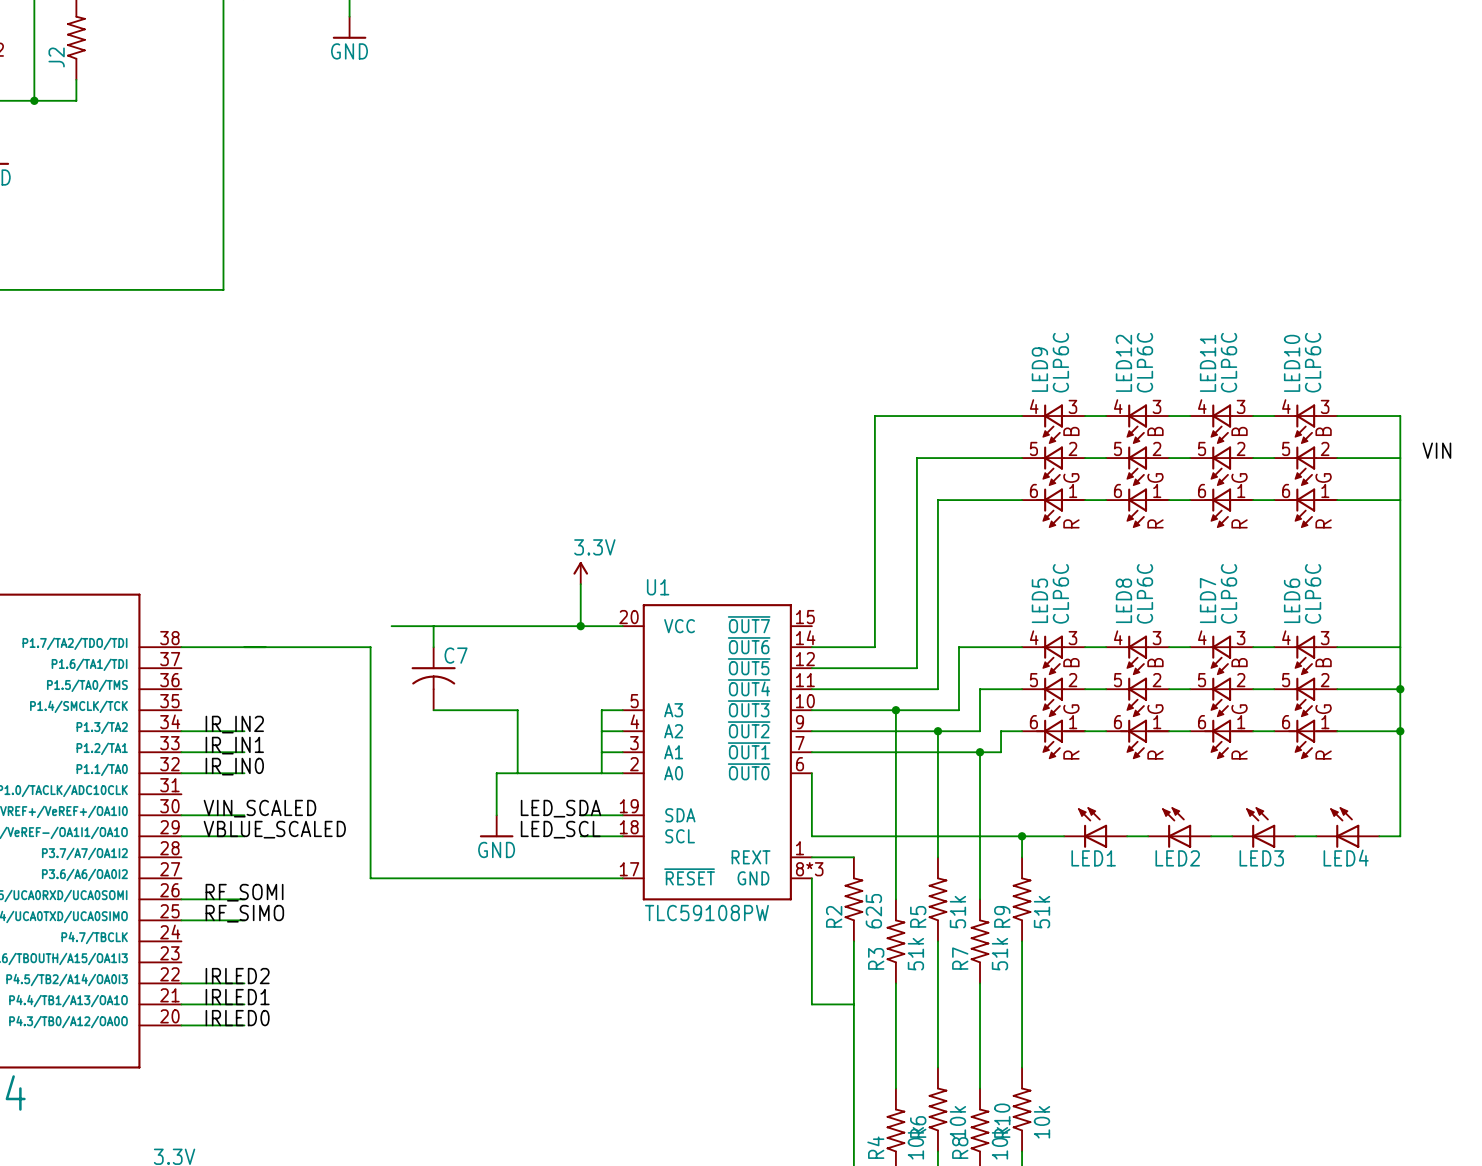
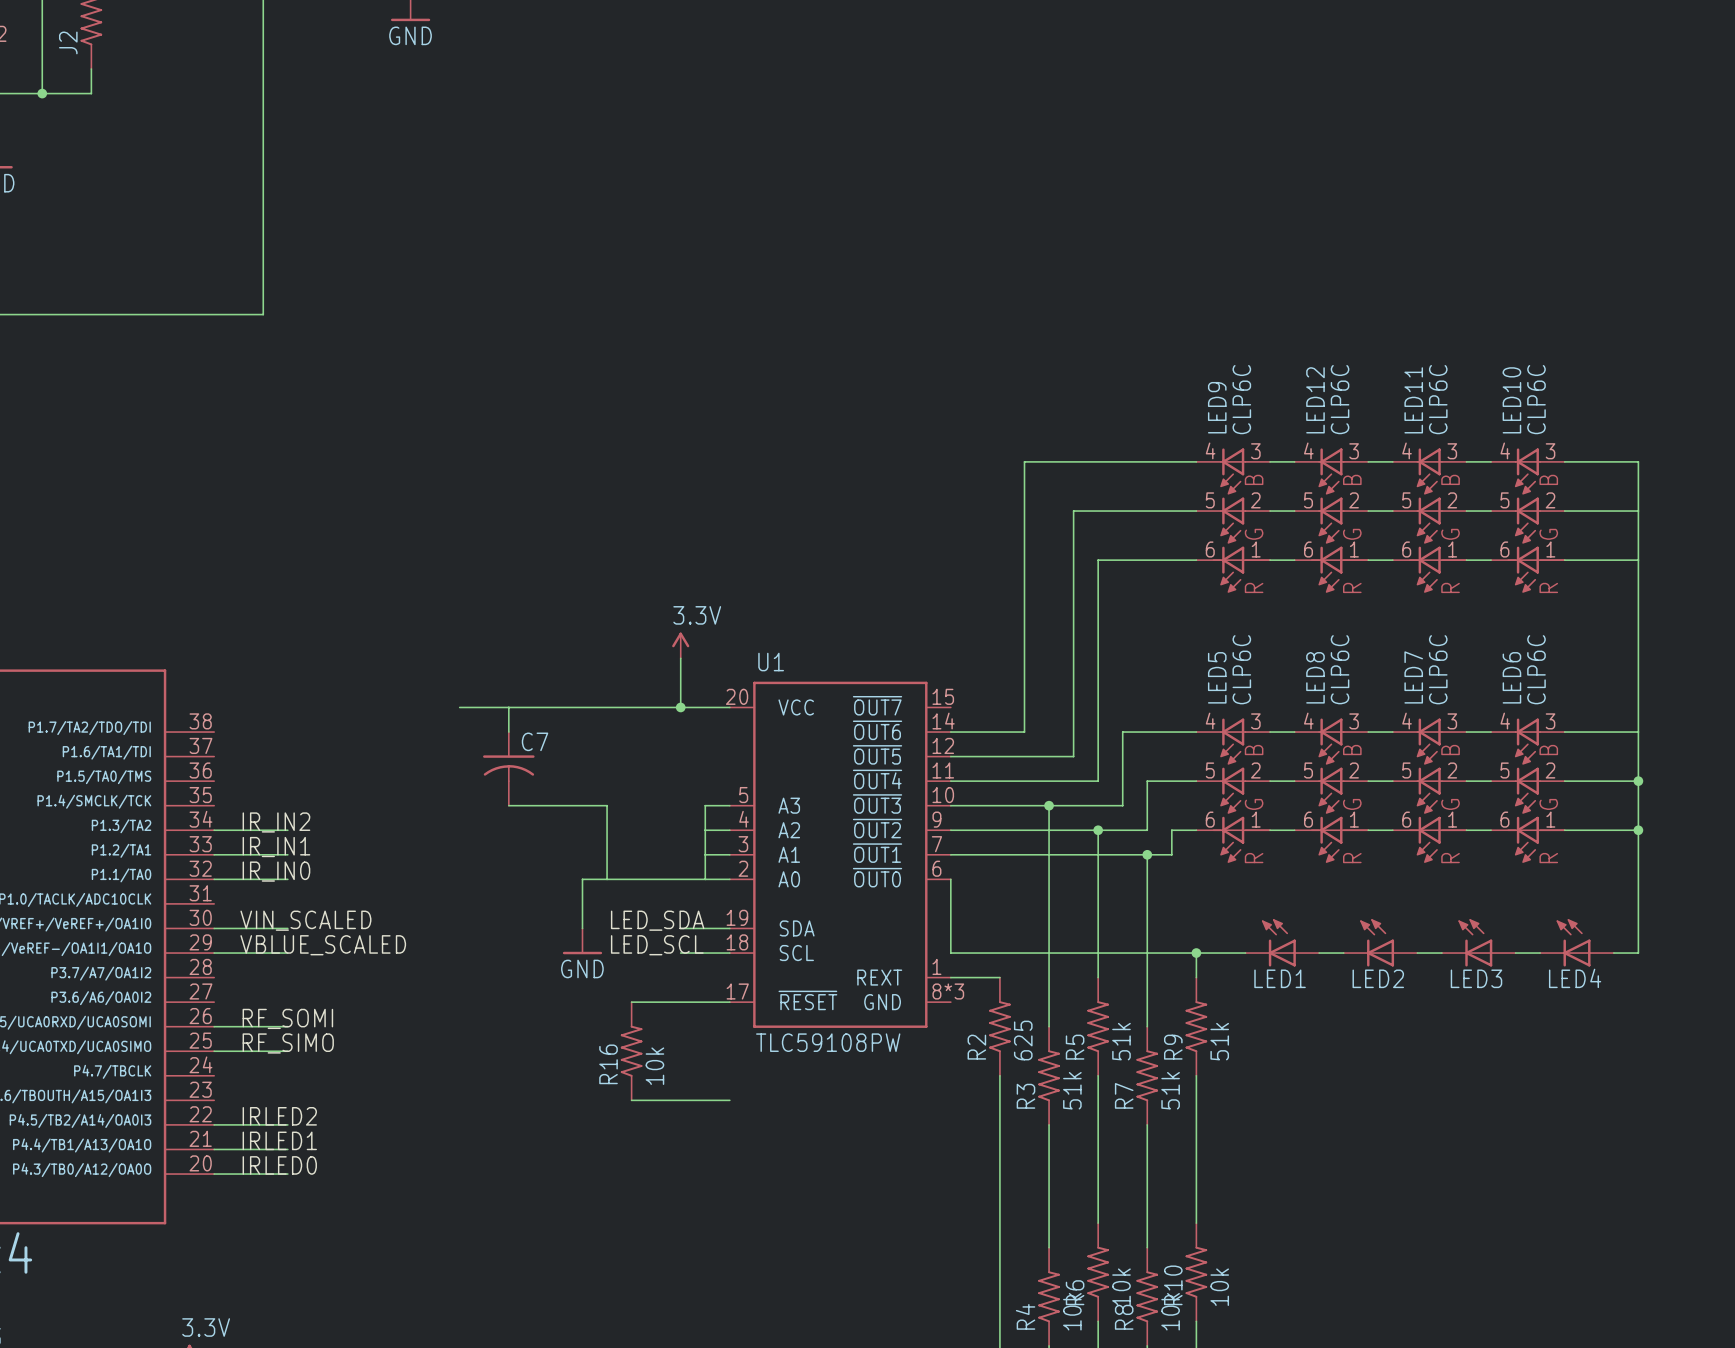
label: VIN (1436, 450) -> none
wire: (181, 647) (370, 647) (370, 878) (538, 878) -> none
wire: (811, 878) (811, 1004) (853, 1004) -> none
R16: none -> 10k (631, 1051)
wire: none -> (631, 1100) (729, 1100)

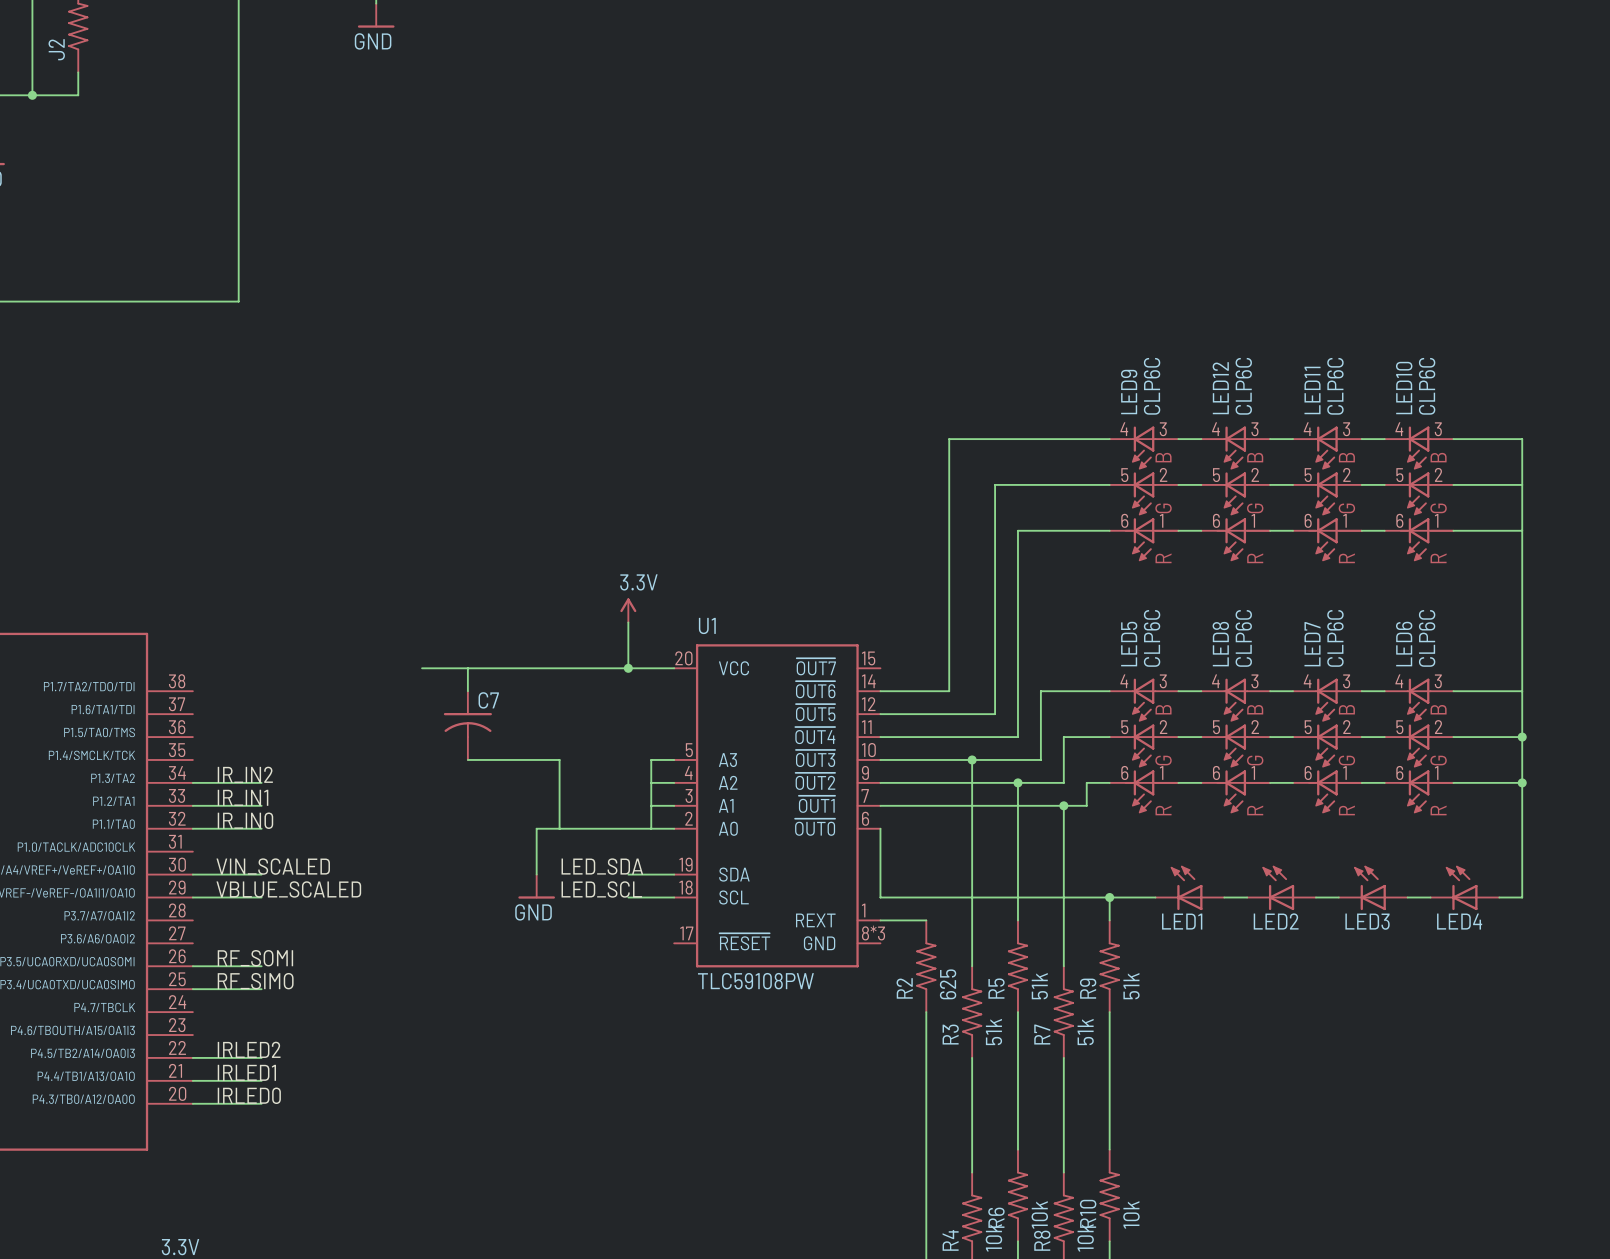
wire: (631, 1002) (729, 1002) -> none
R16: 10k (631, 1051) -> none
wire: (631, 1100) (729, 1100) -> none

